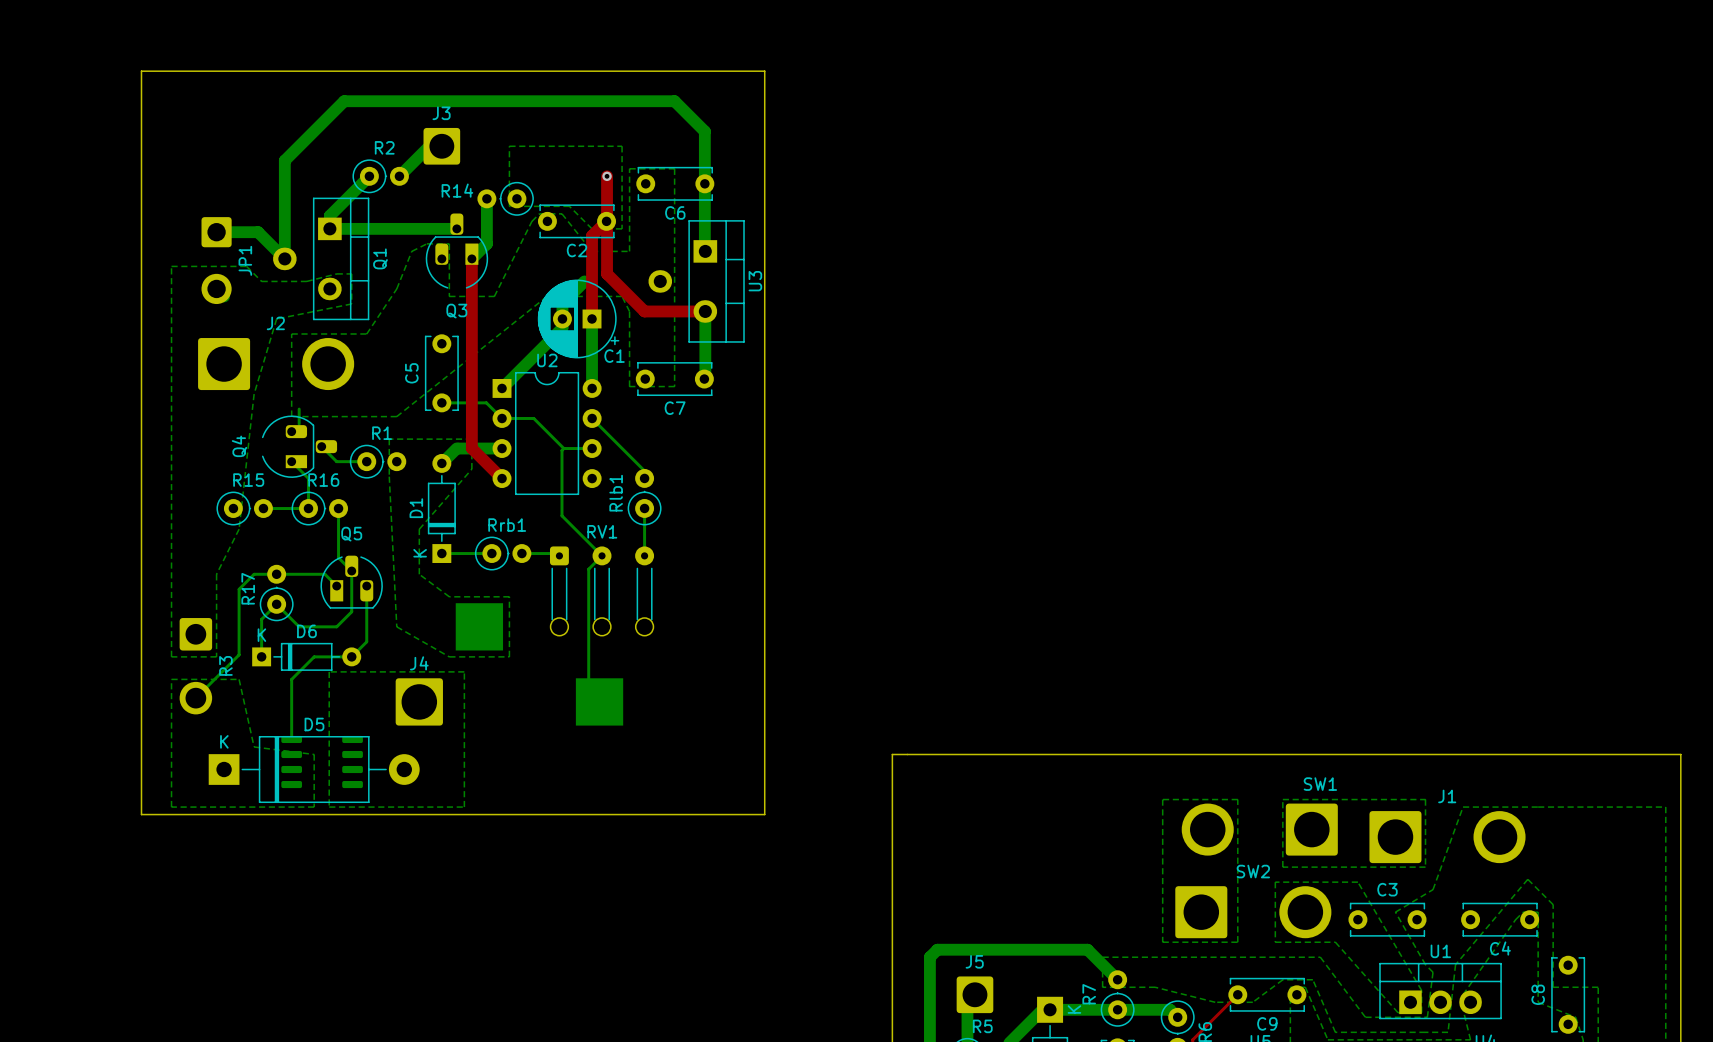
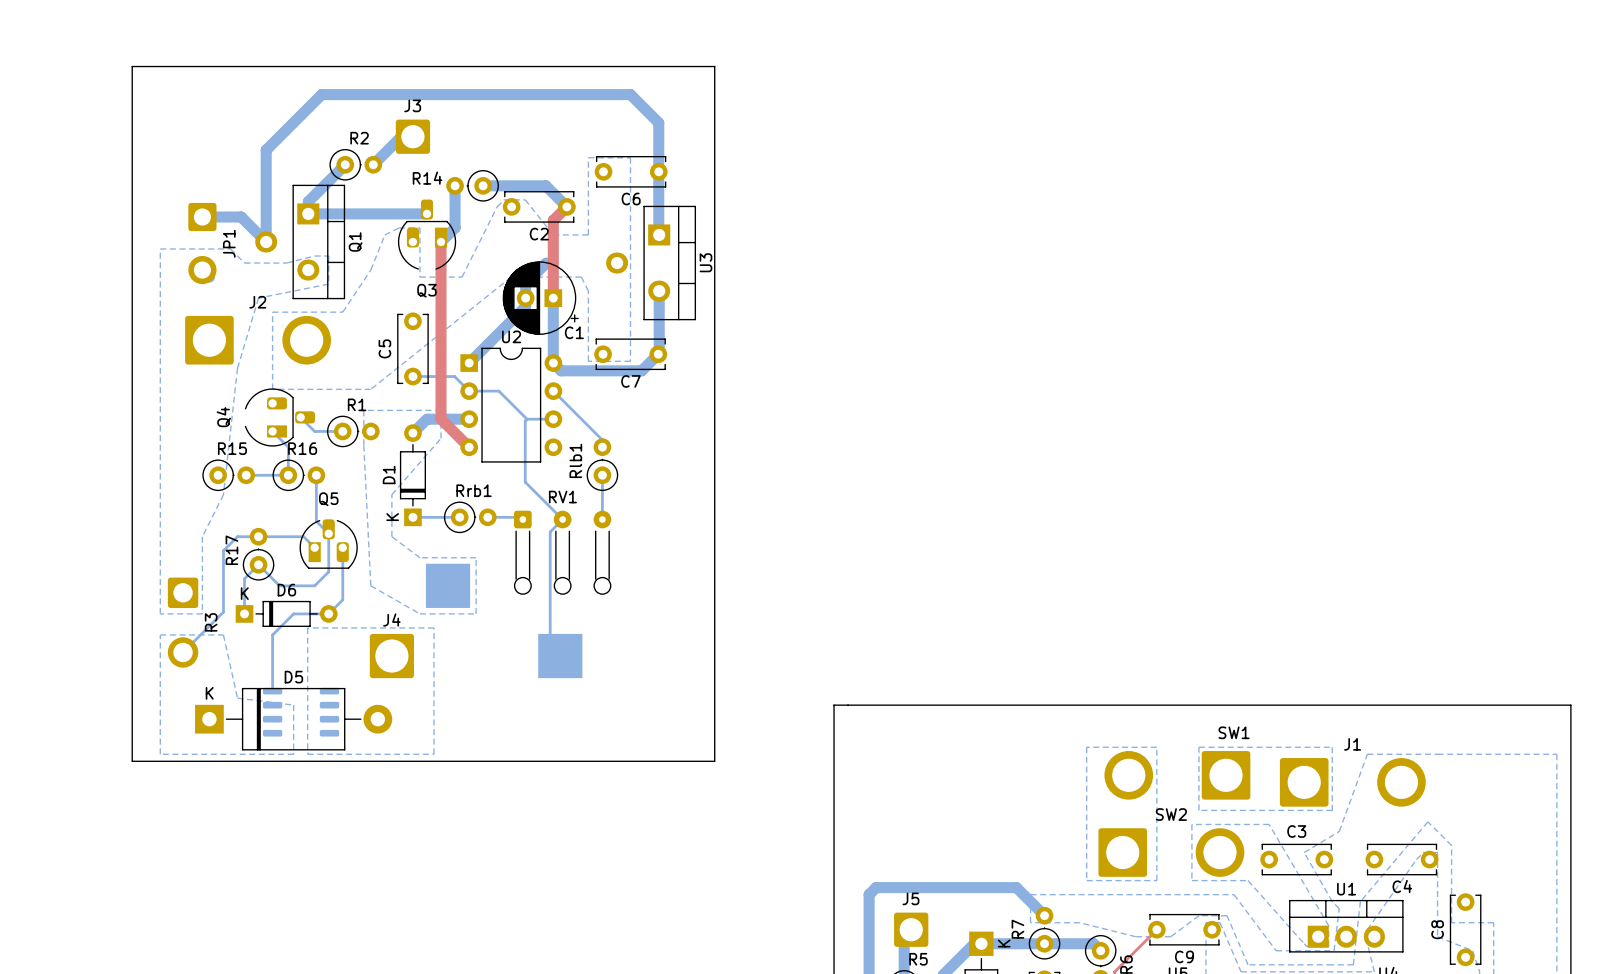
bottom zone outline: (509, 146) (509, 206) (569, 206) (592, 228) (622, 228) (622, 146) (509, 146) -> none
top track: (607, 176) (607, 273) (644, 311) (705, 311) -> none
via: (607, 176) -> none
bottom track: none -> (483, 185) (545, 185) (566, 206)
bottom track: none -> (658, 354) (641, 370) (561, 370) (553, 363)
bottom track: (299, 409) (299, 424) -> none

